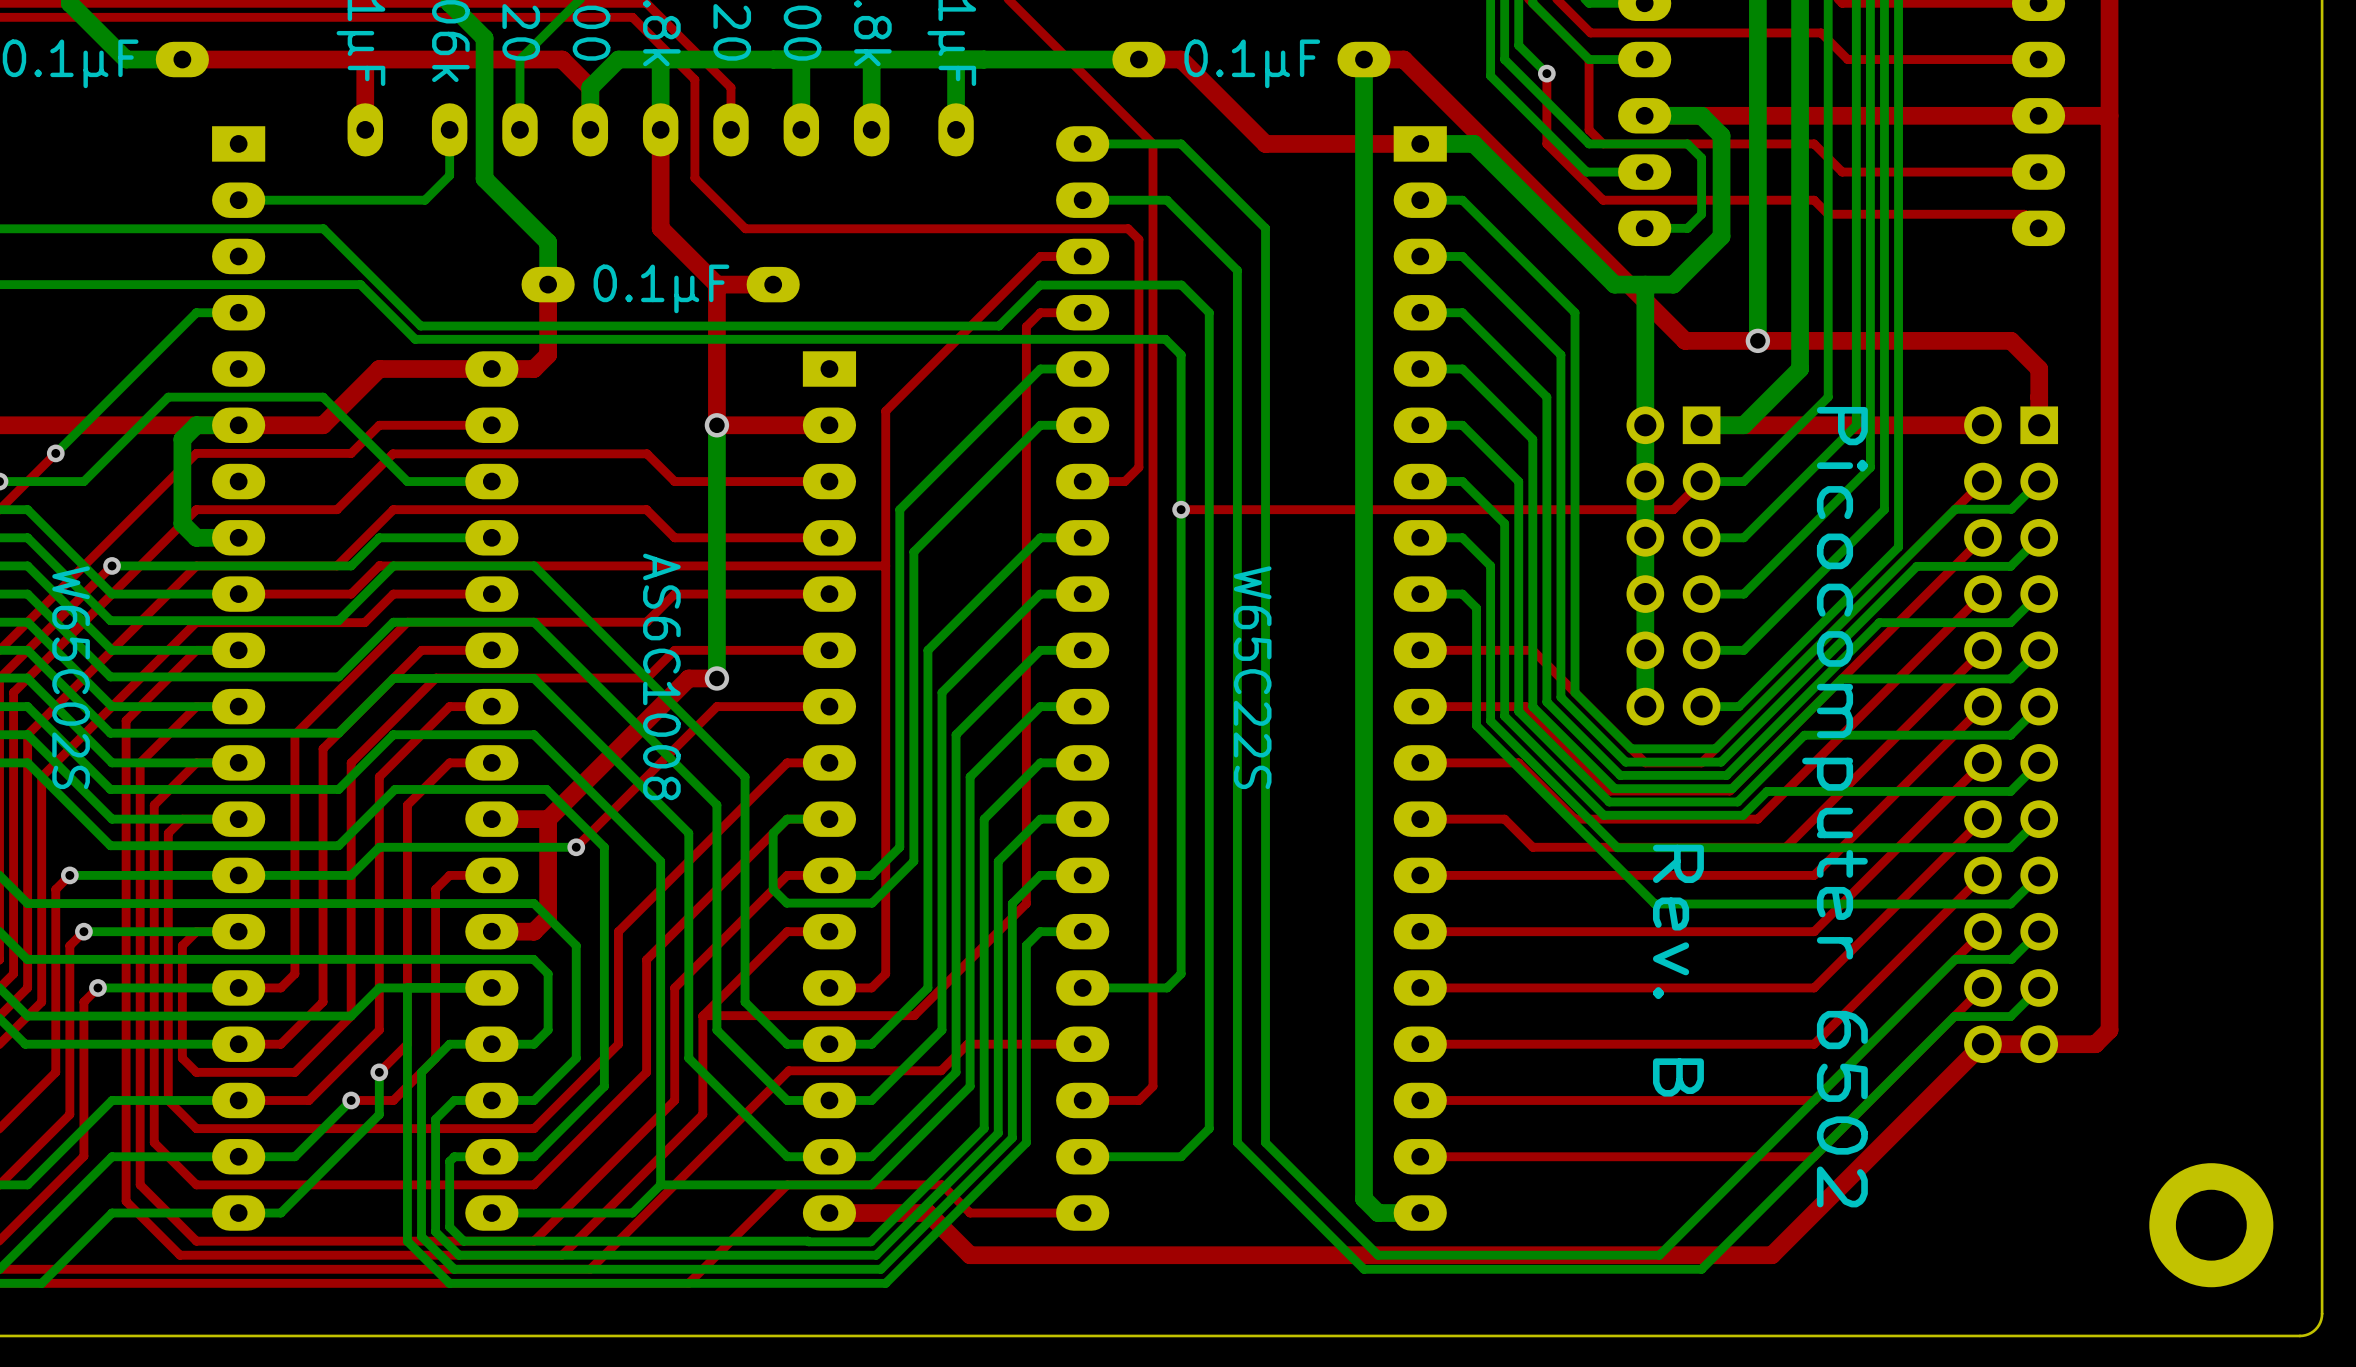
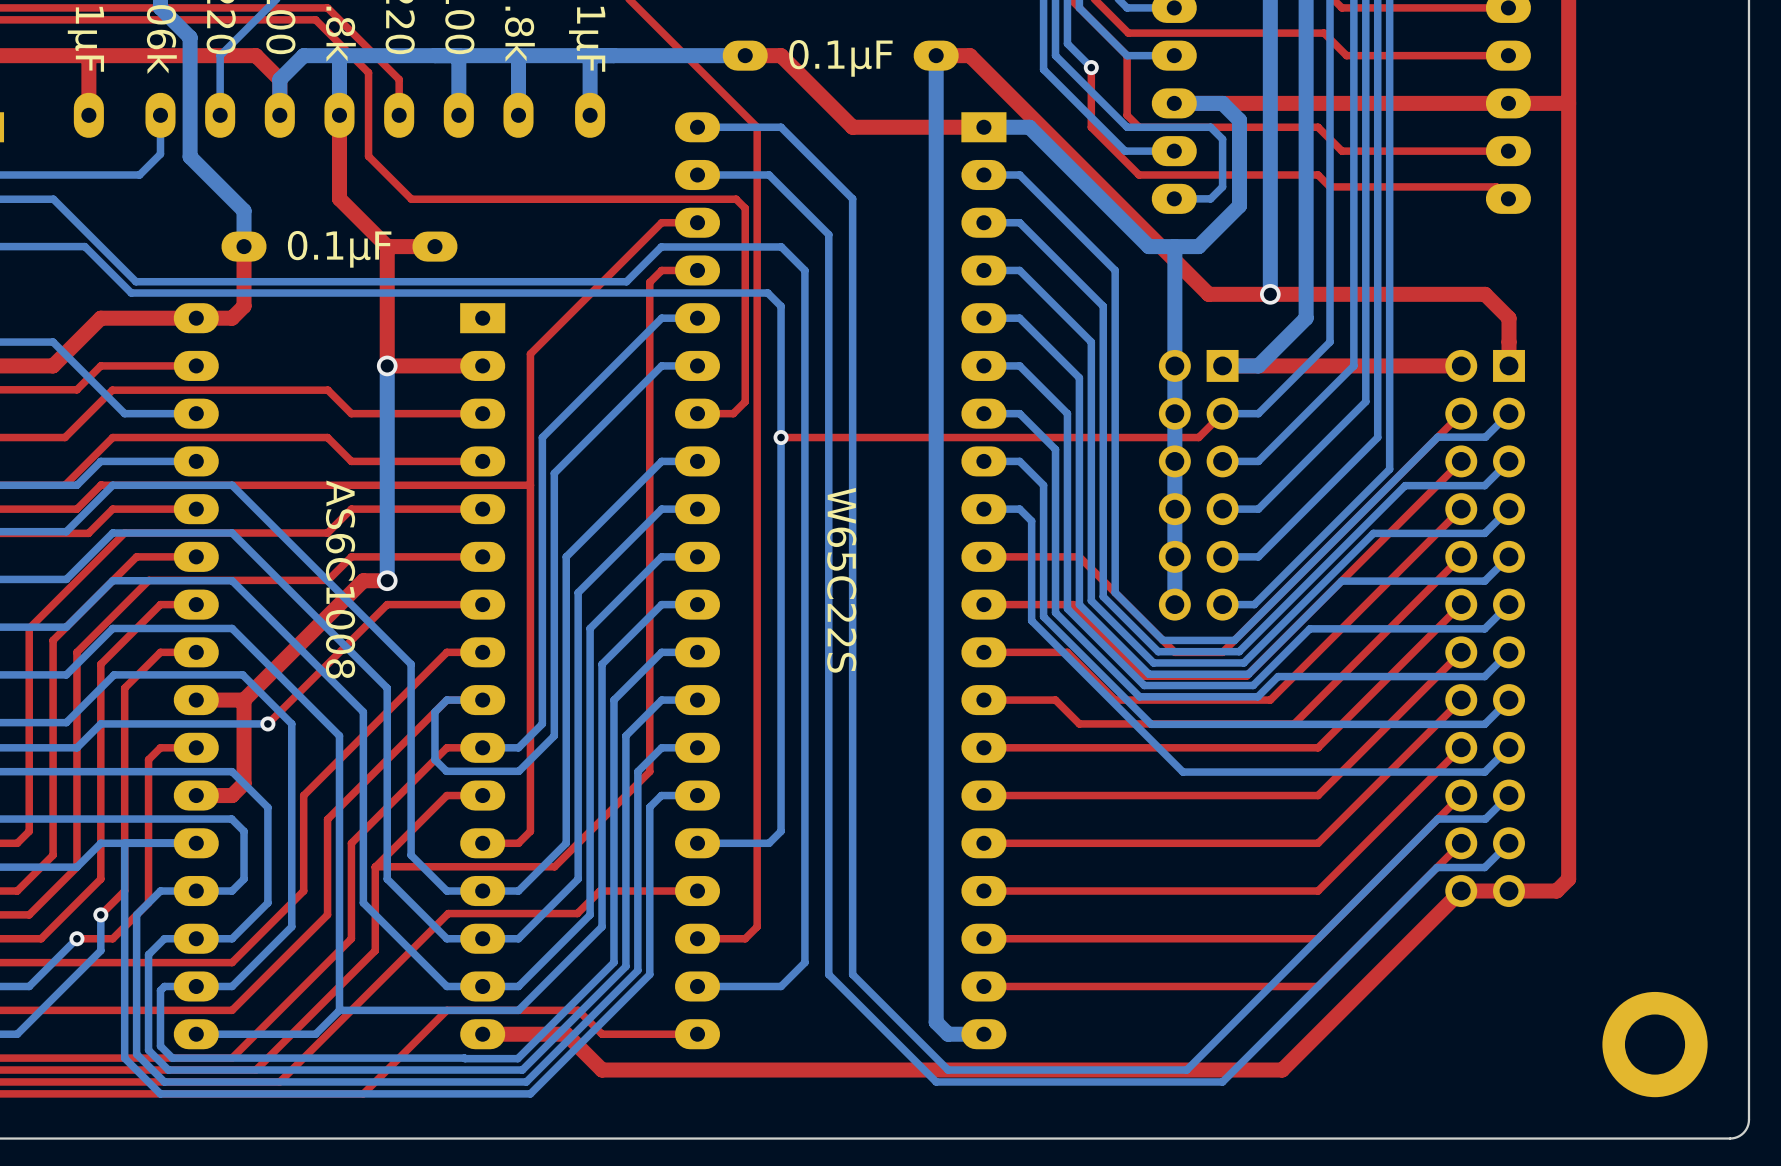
text: Picocomputer 6502 (1834, 807) -> none
text: Rev. B (1678, 970) -> none

